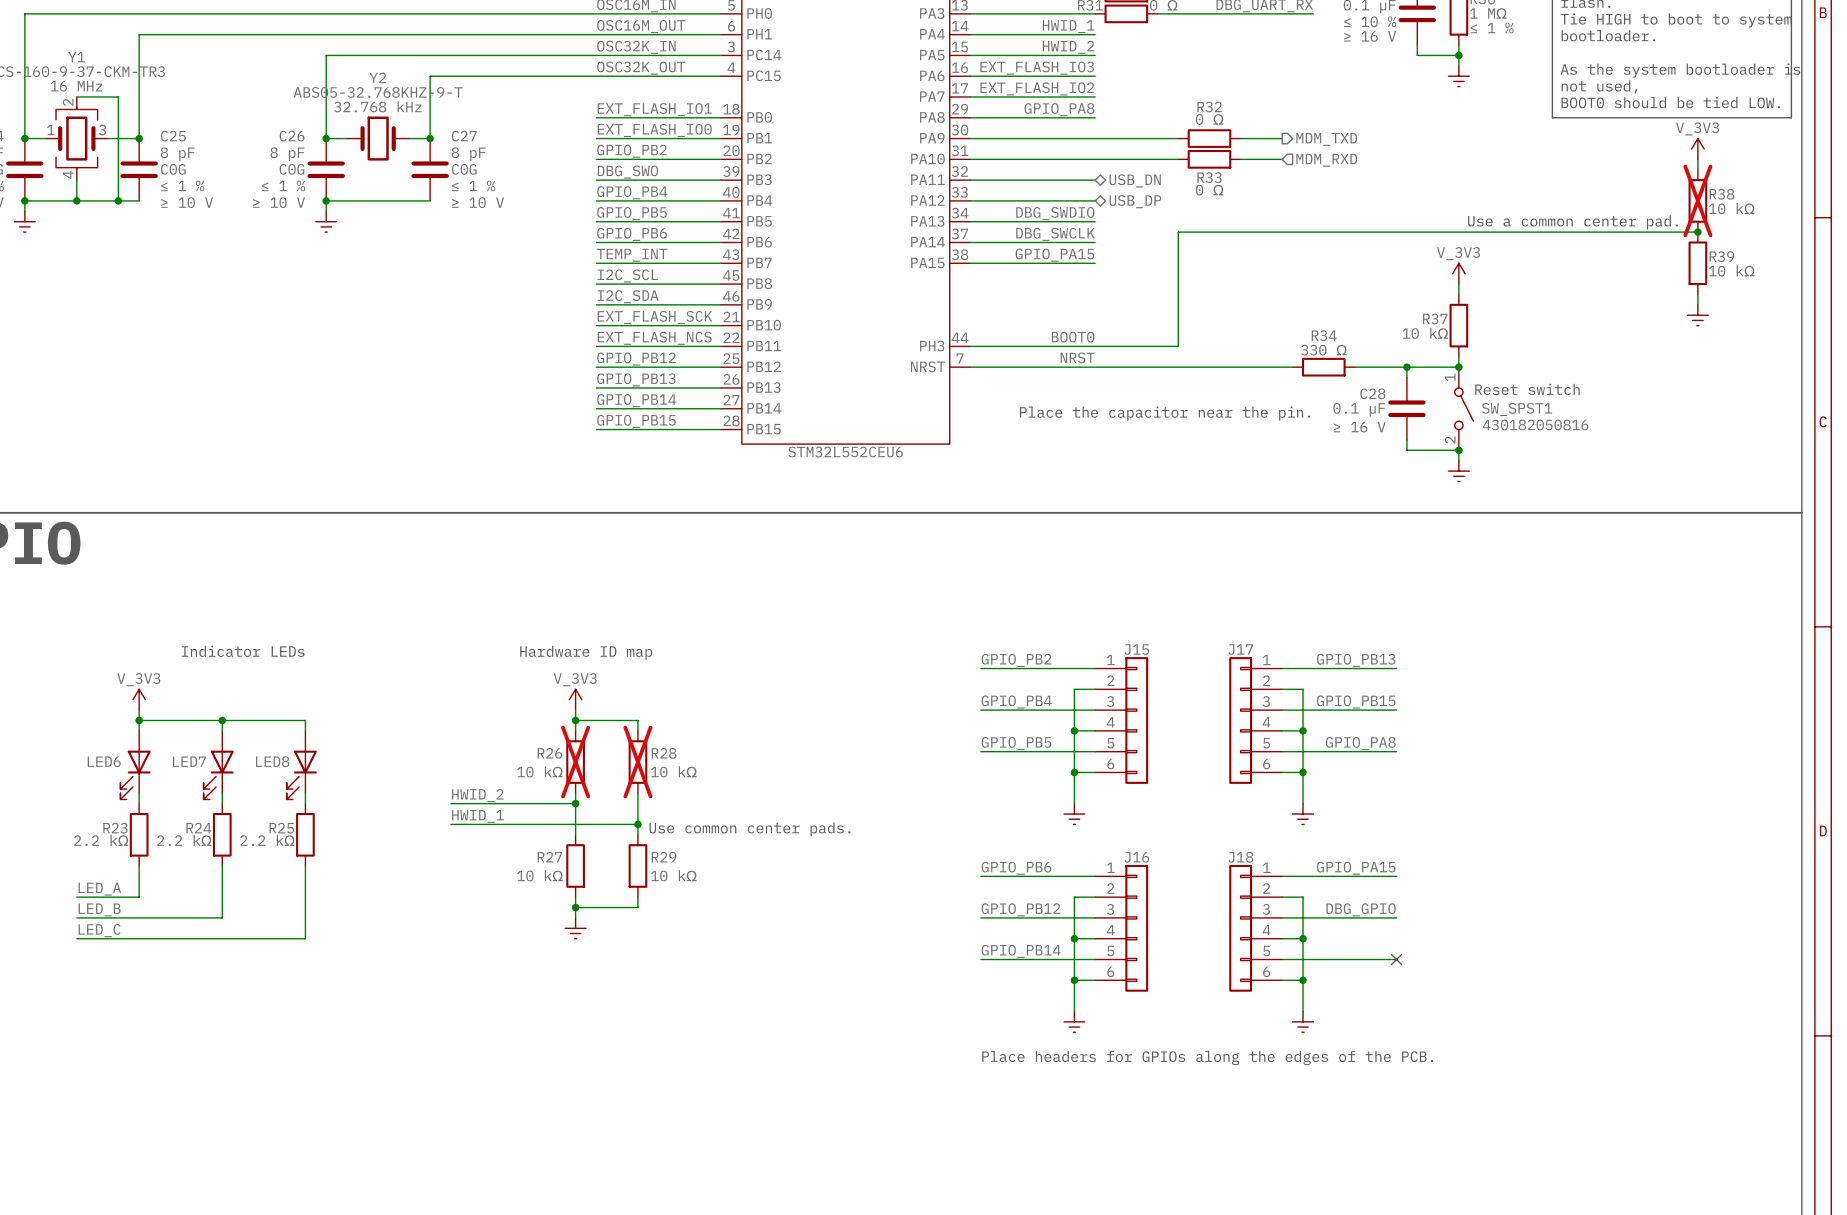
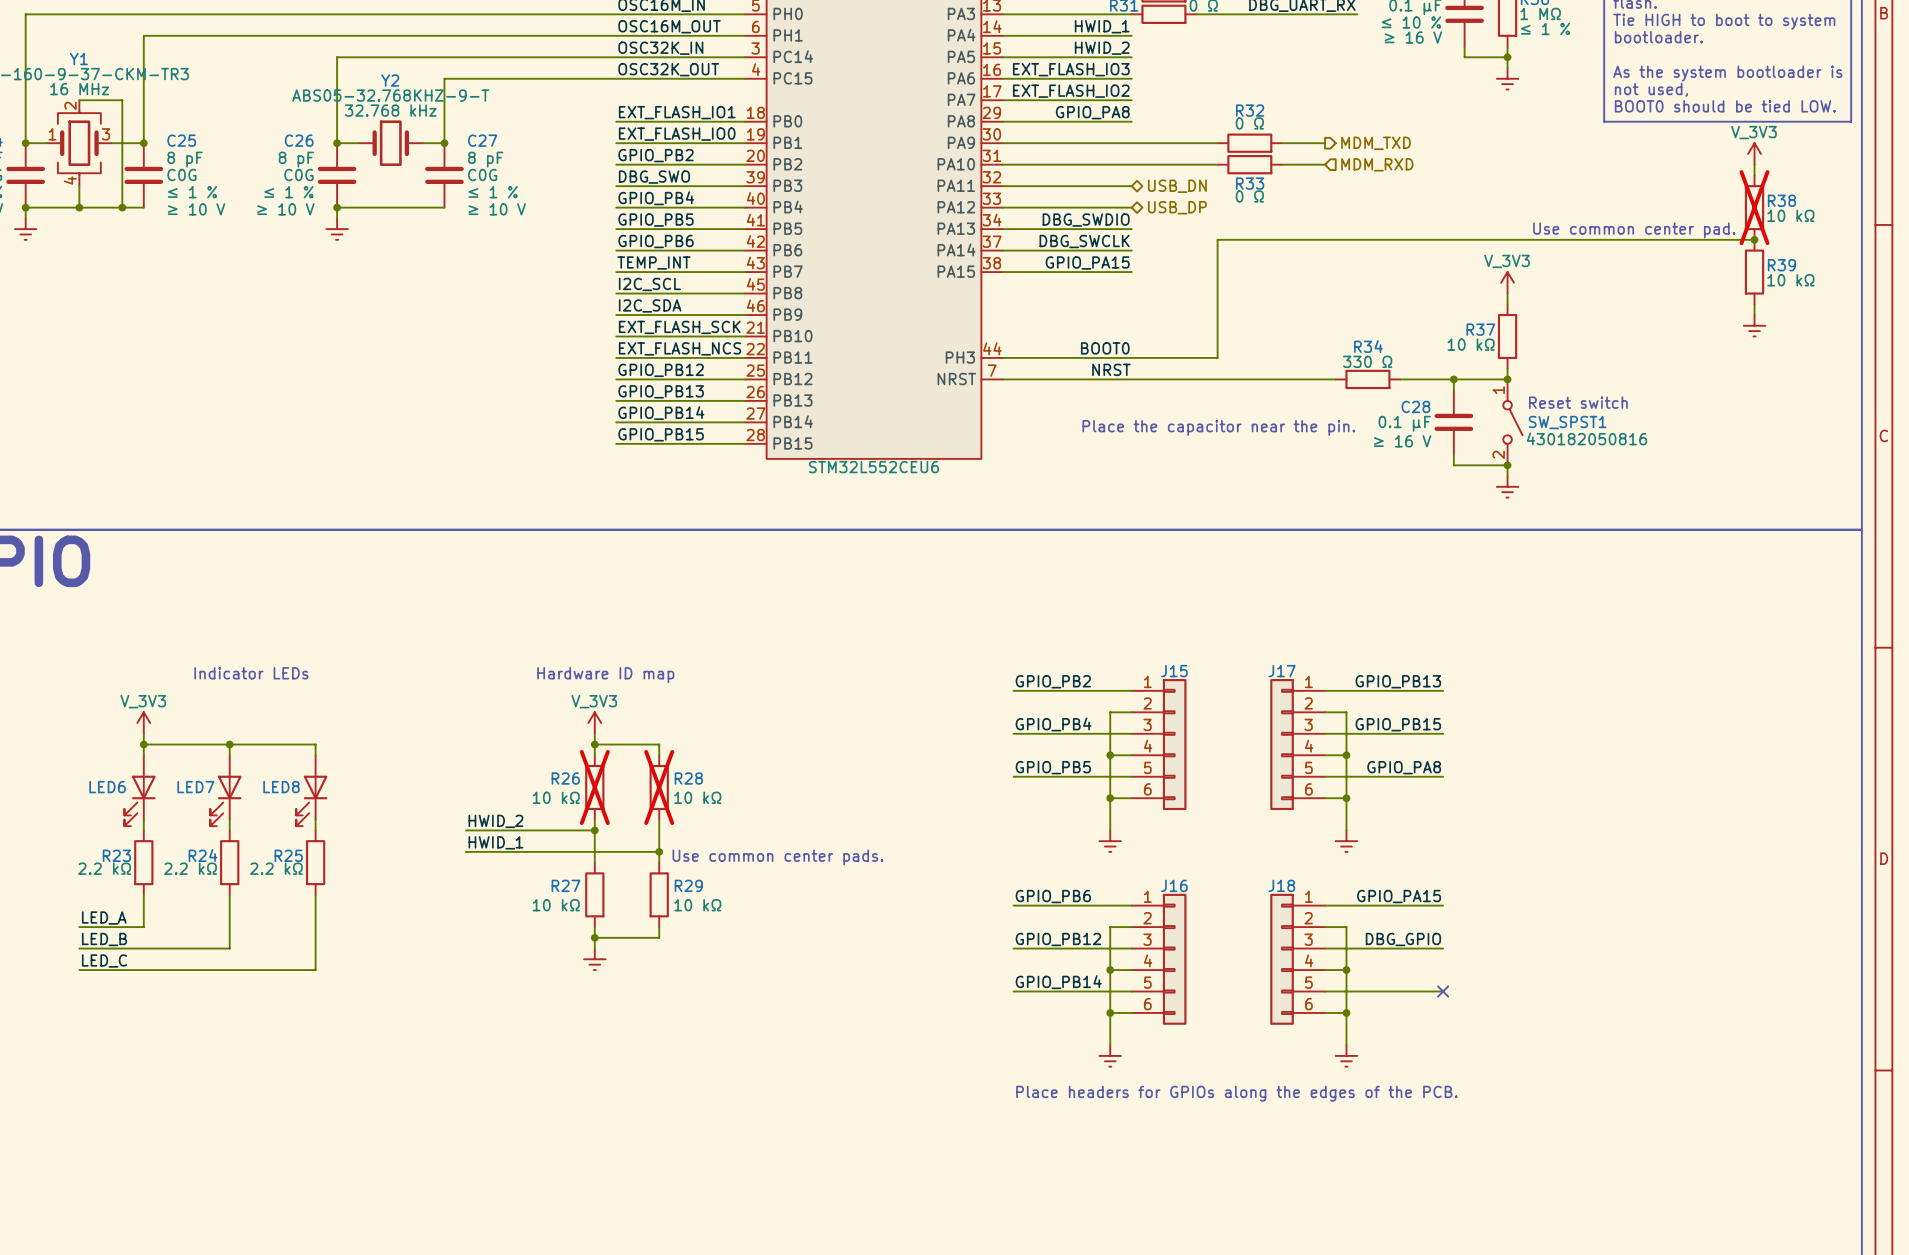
text: Use a common center pad. (1572, 222) -> Use common center pad. (1634, 230)

